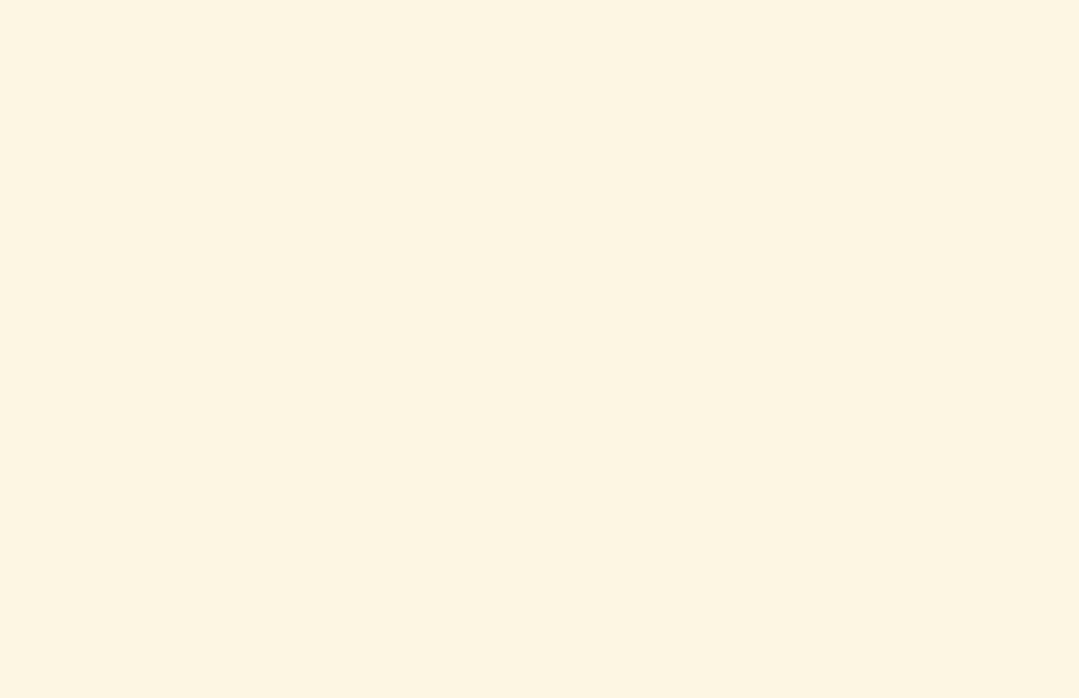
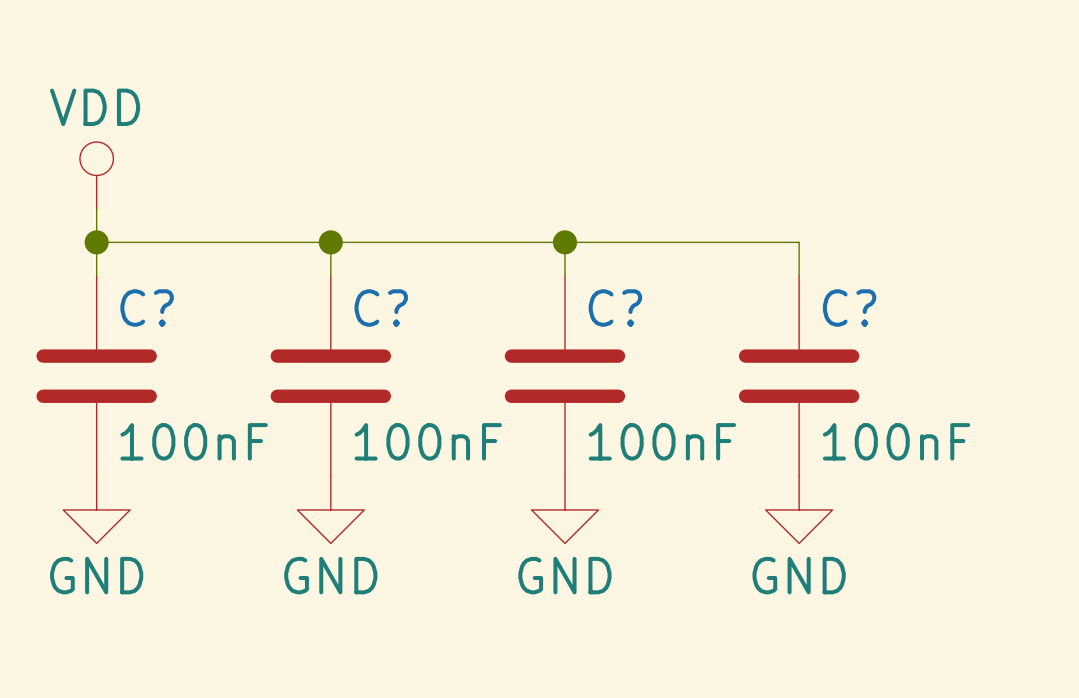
power symbol: none -> VDD (96, 175)
wire: none -> (96, 208) (96, 275)
wire: none -> (96, 242) (799, 242) (799, 275)
junction: none -> (96, 242)
wire: none -> (330, 242) (330, 275)
junction: none -> (330, 242)
wire: none -> (564, 242) (564, 275)
junction: none -> (564, 242)
C?: none -> 100nF (96, 376)
C?: none -> 100nF (330, 376)
C?: none -> 100nF (564, 376)
C?: none -> 100nF (799, 376)
power symbol: none -> GND (96, 509)
power symbol: none -> GND (330, 509)
power symbol: none -> GND (564, 509)
power symbol: none -> GND (799, 509)

